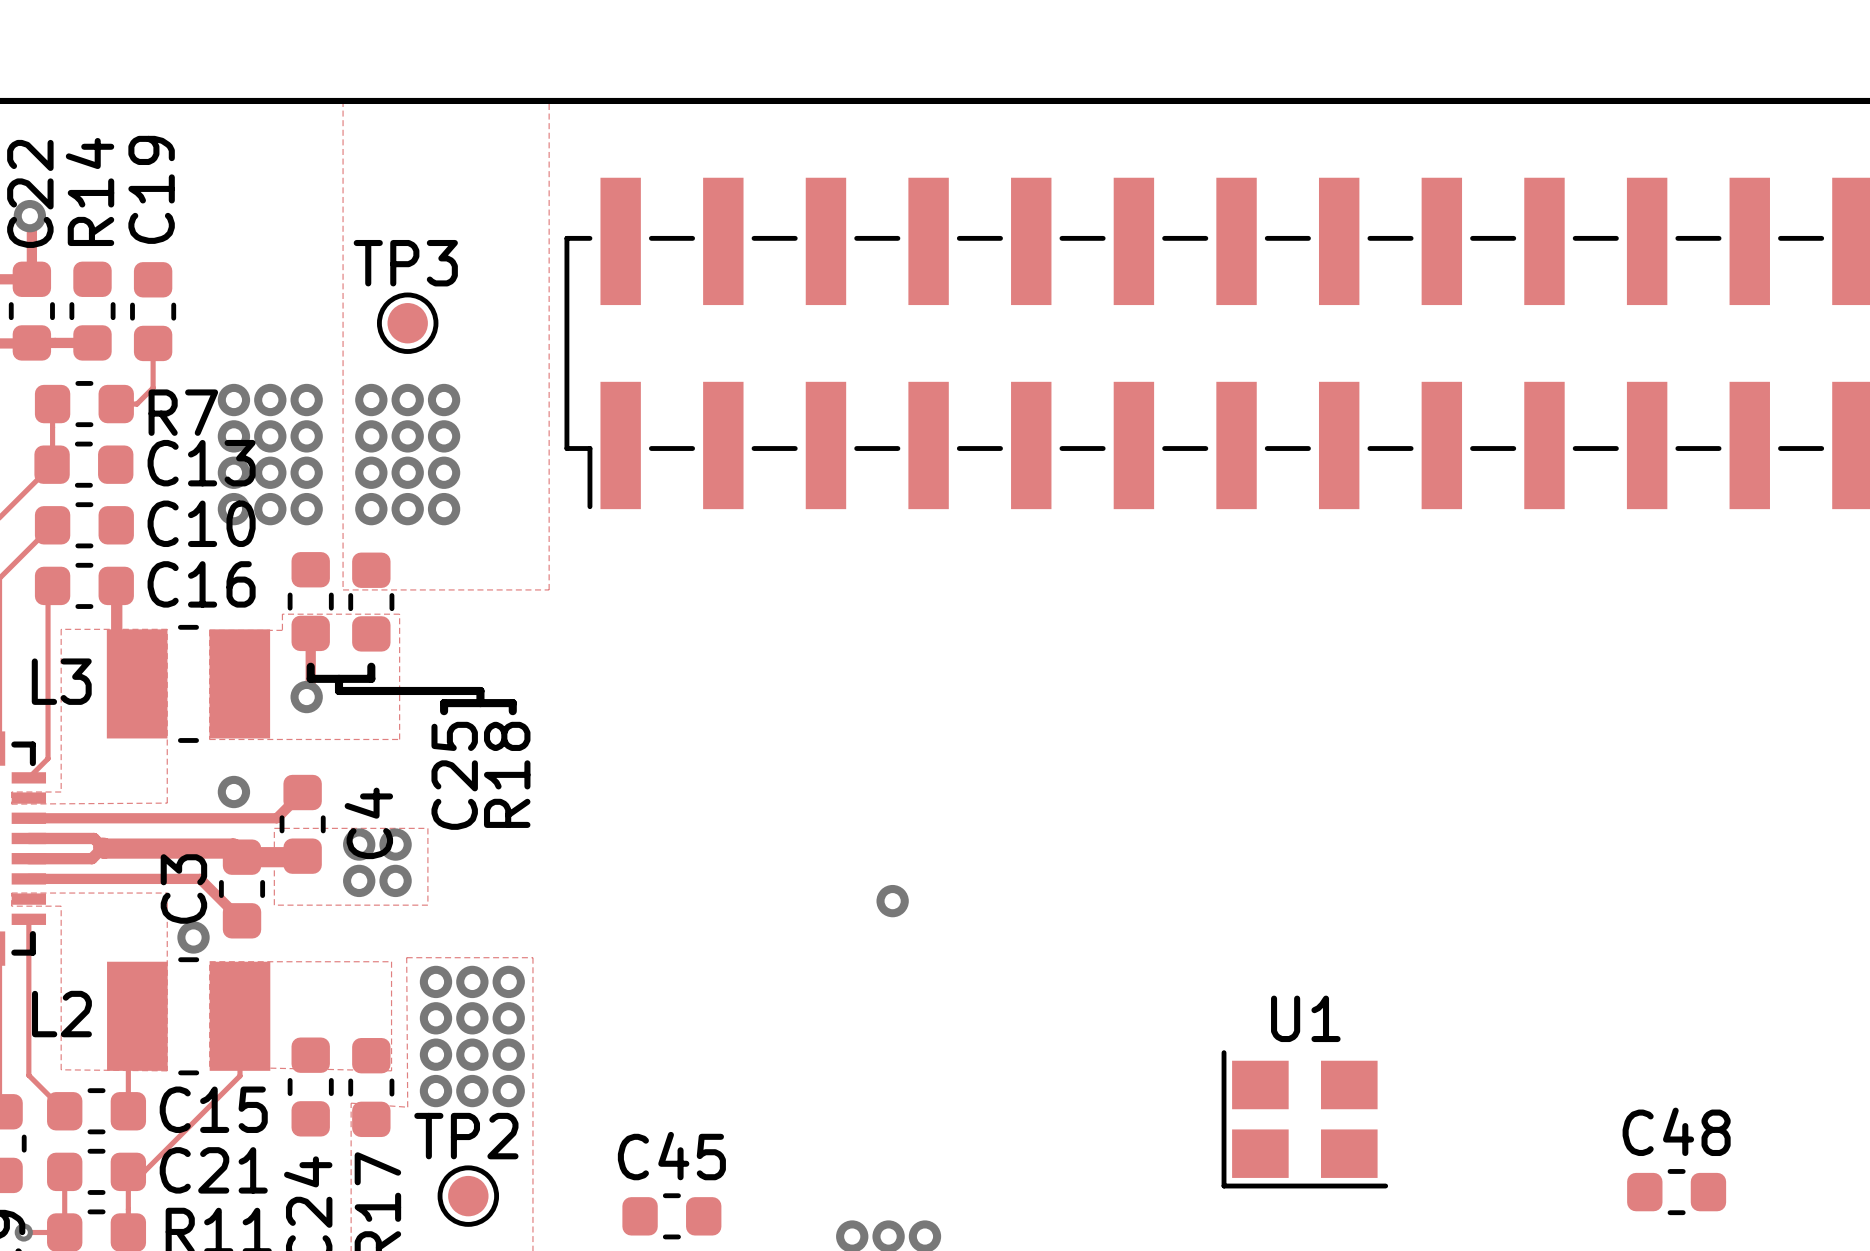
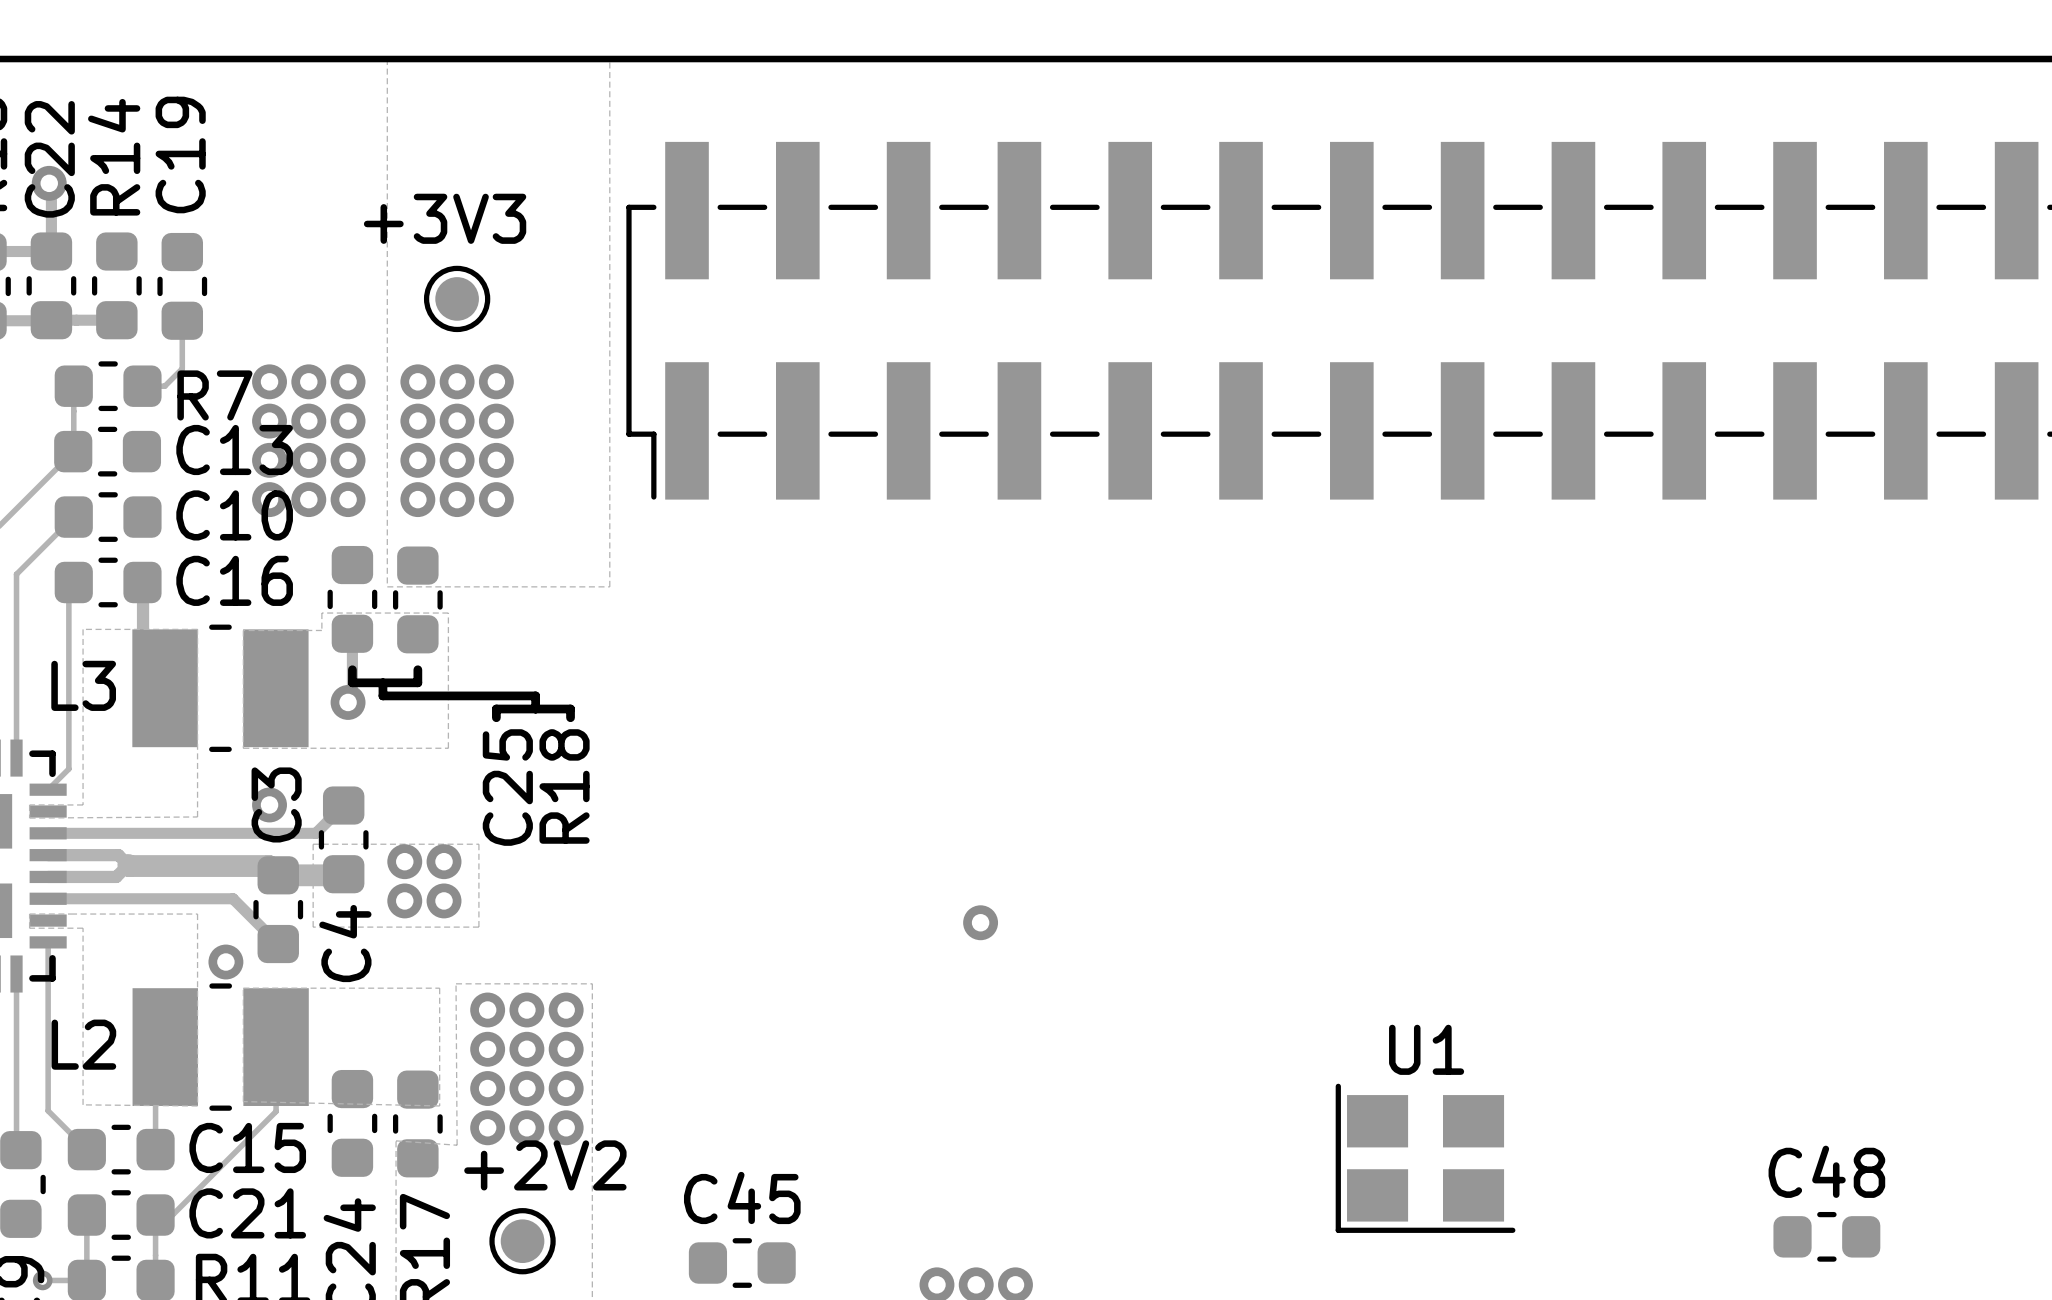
text: none -> +3V3 (445, 218)
TP3 name: TP3 (405, 263) -> none
C4 name position: C4 (368, 823) -> C4 (345, 943)
C3 name position: C3 (183, 888) -> C3 (276, 804)
text: none -> +2V2 (545, 1165)
TP2 name: TP2 (466, 1136) -> none

